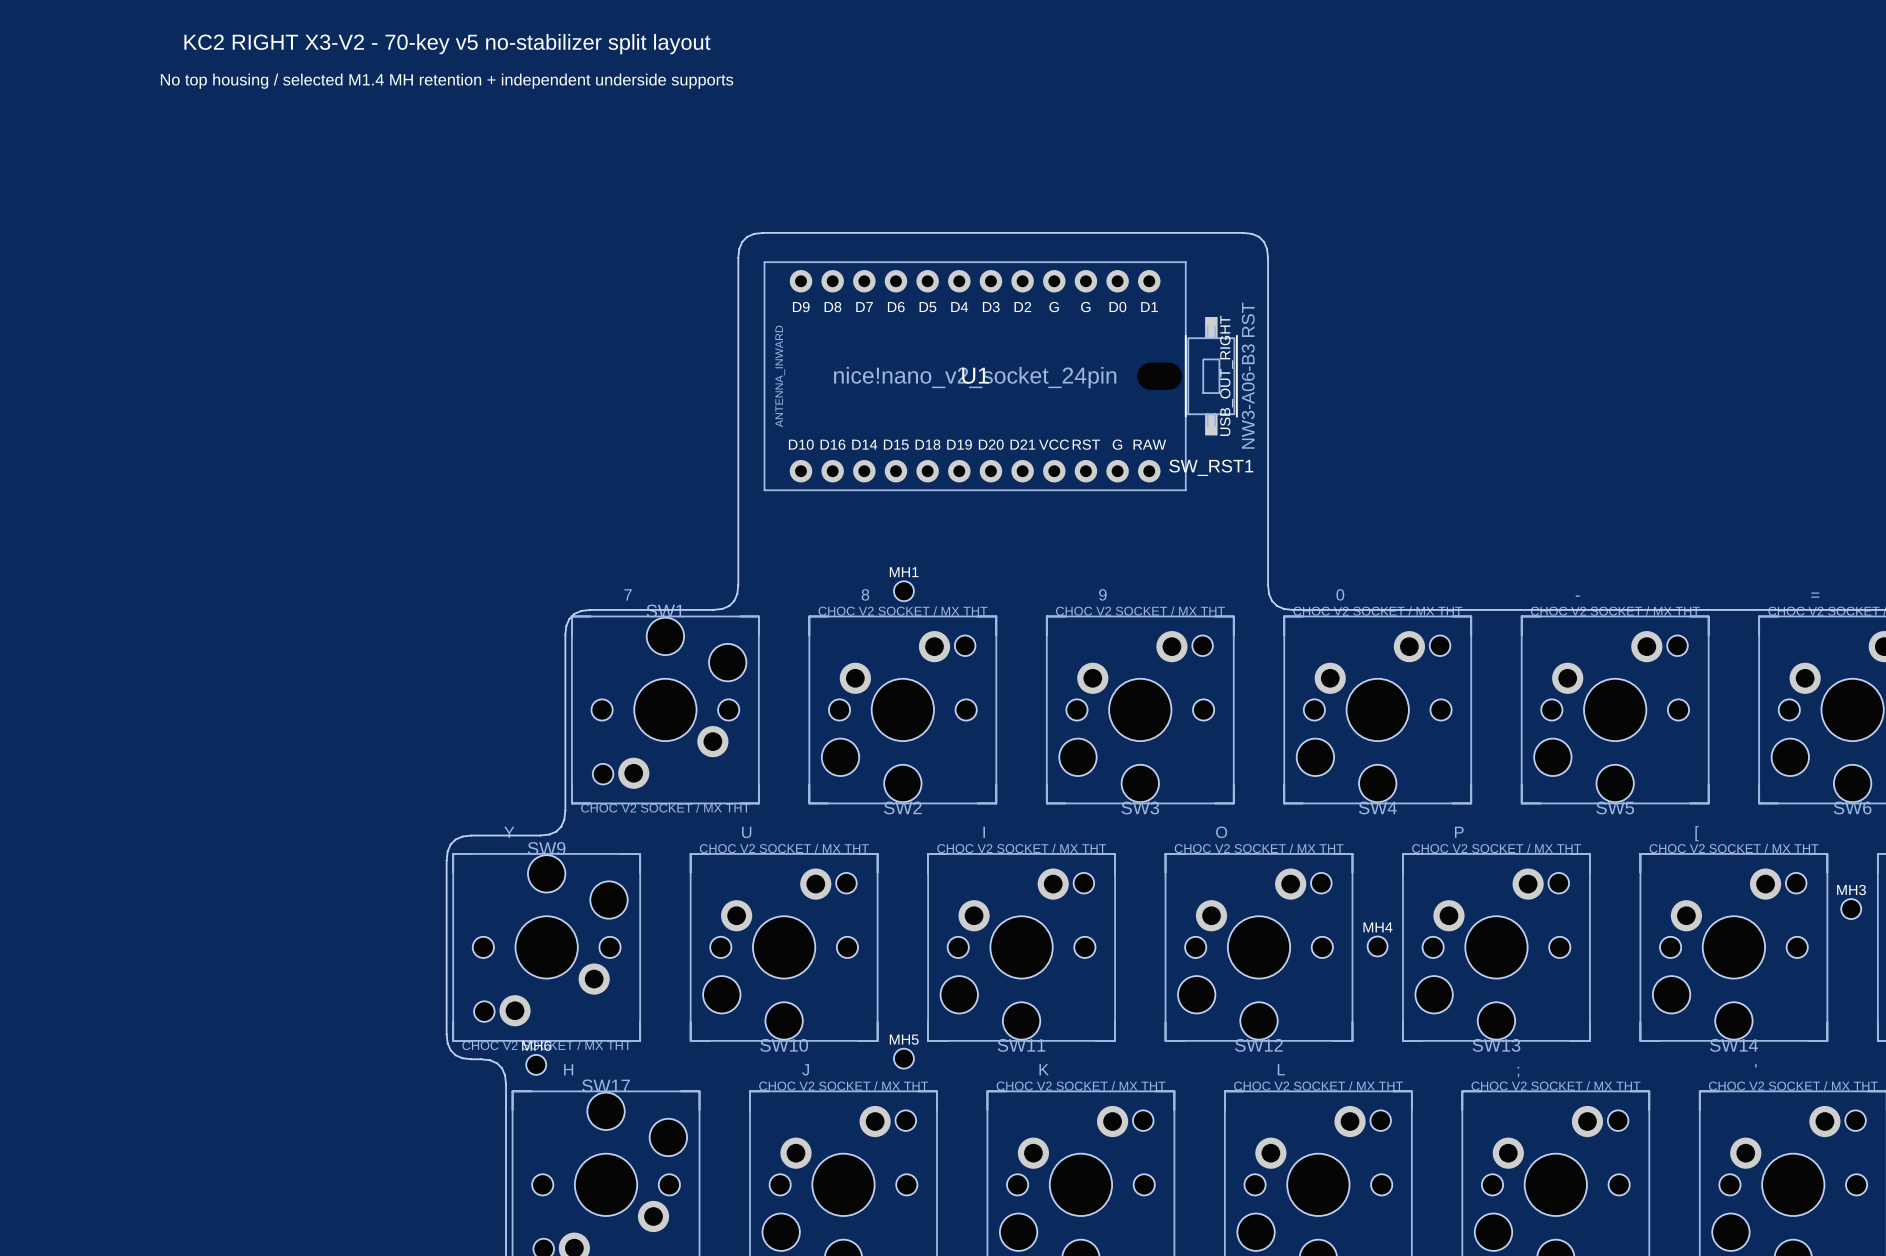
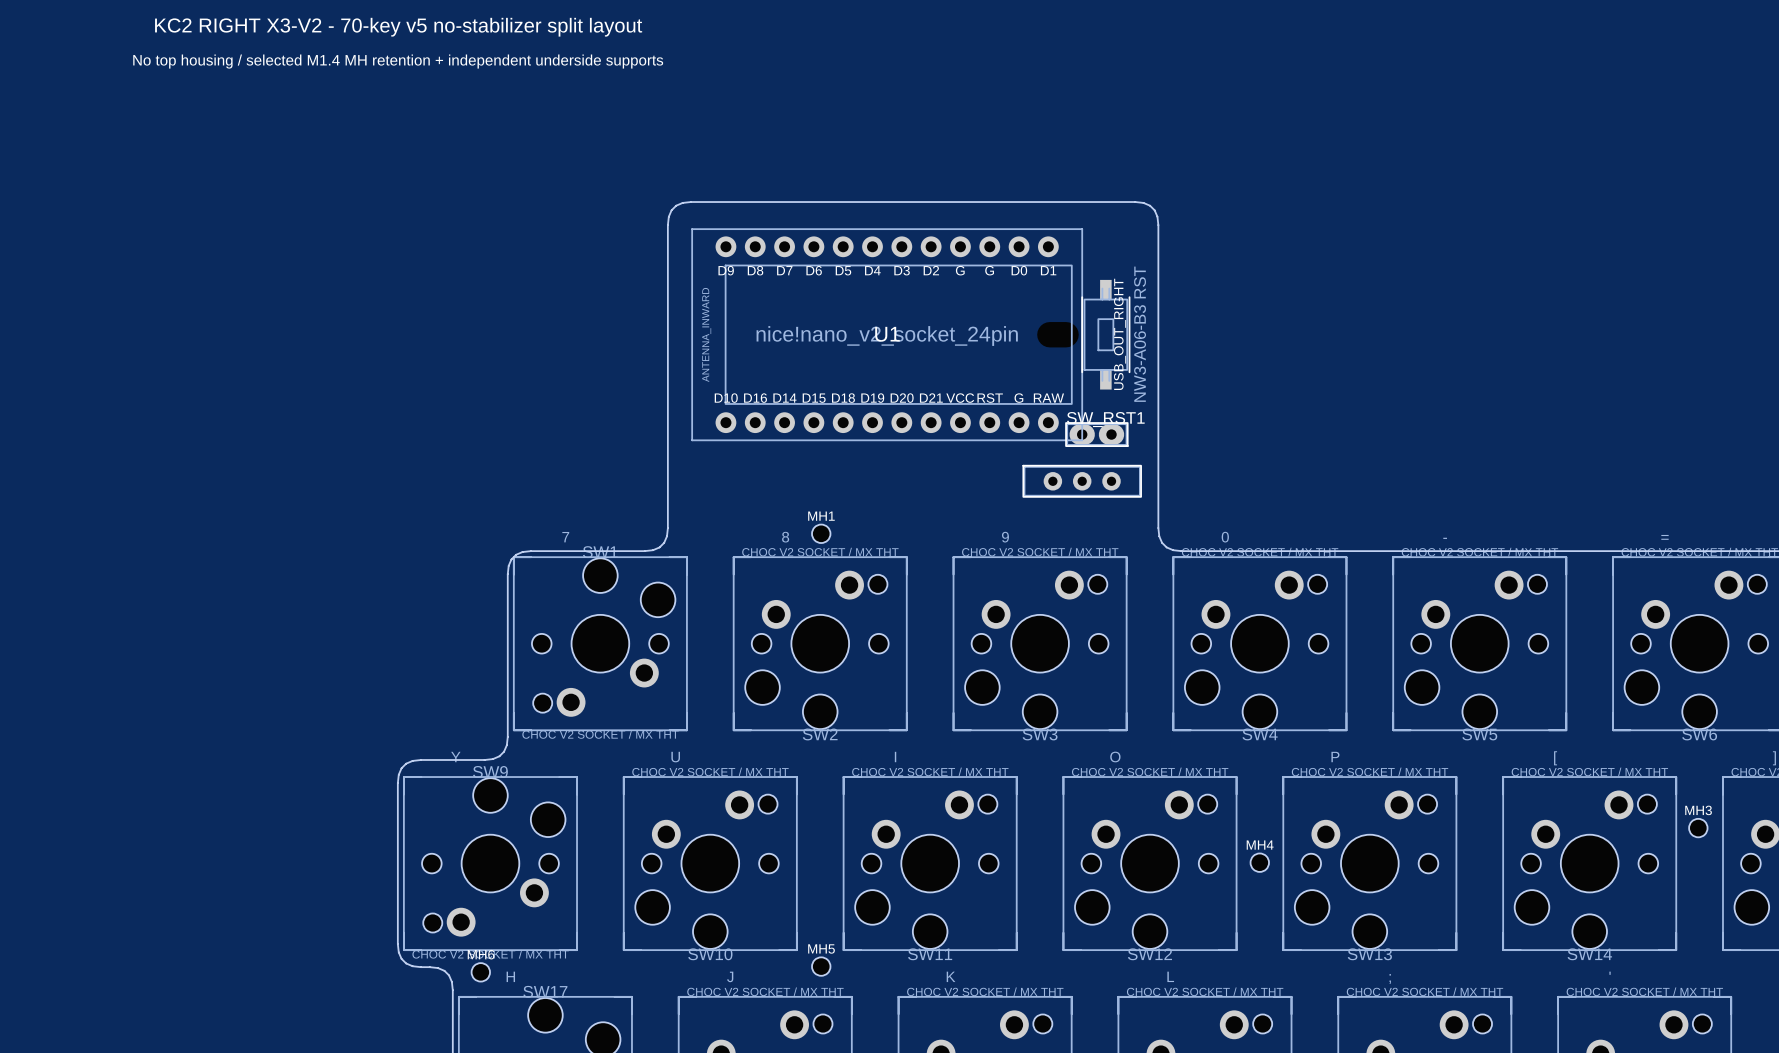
drawing: none -> [725, 264, 1073, 405]
part: none -> (1096, 434)
part: none -> (1082, 481)

